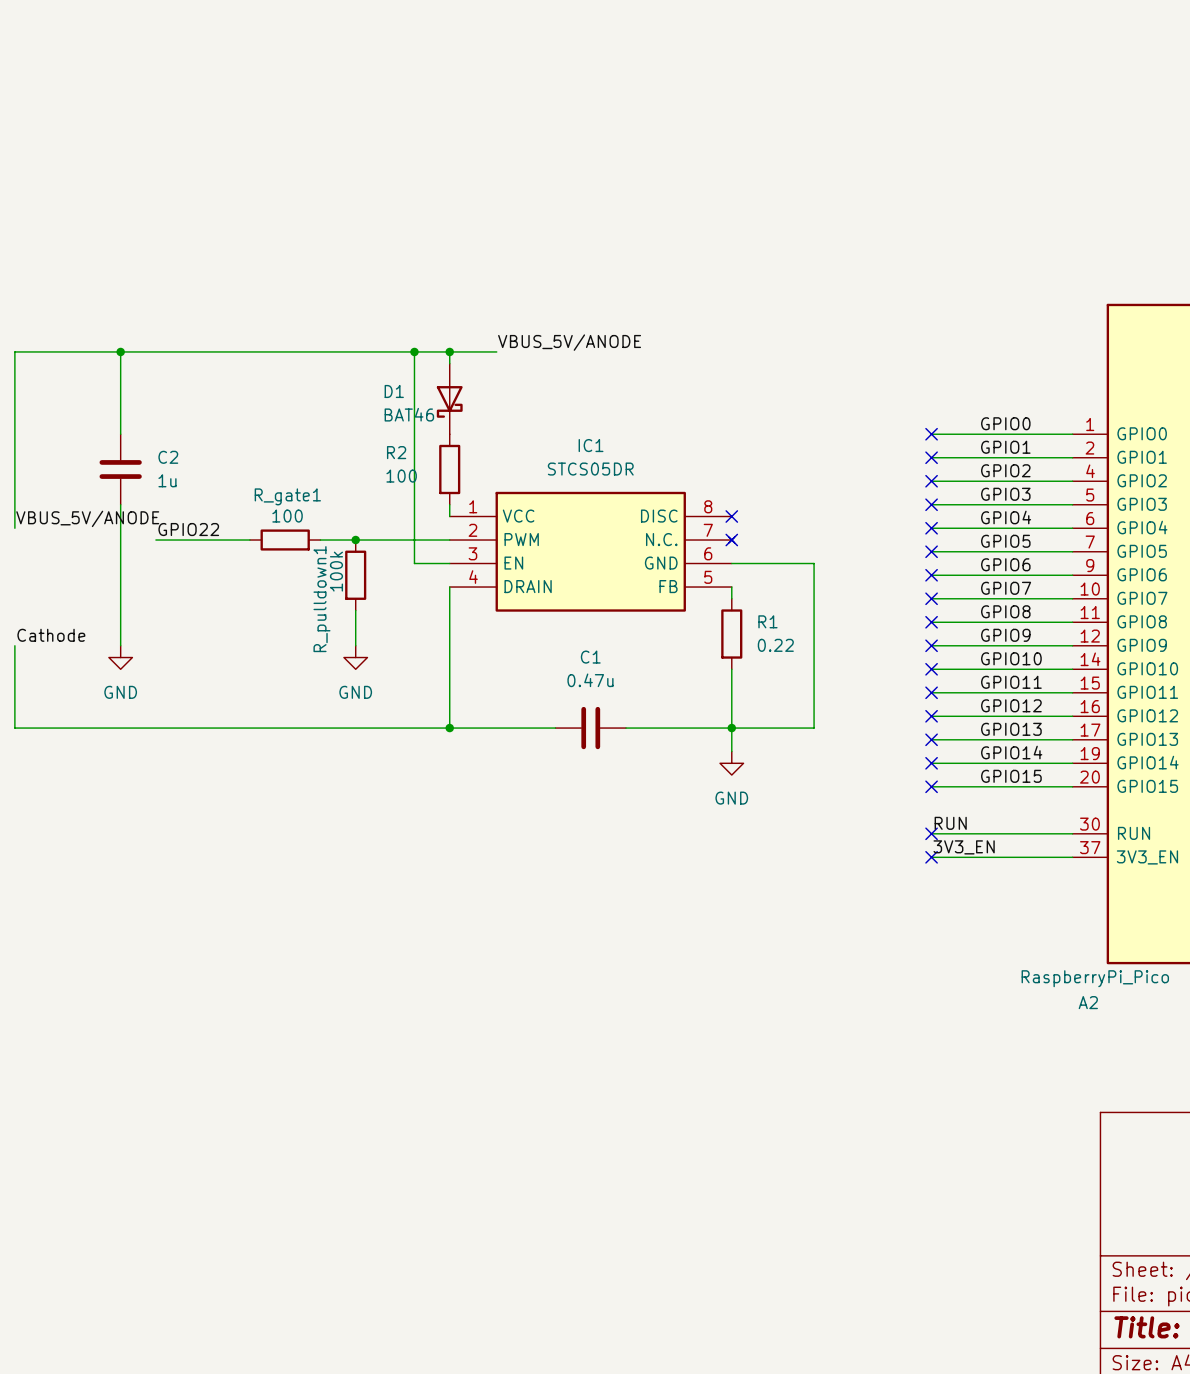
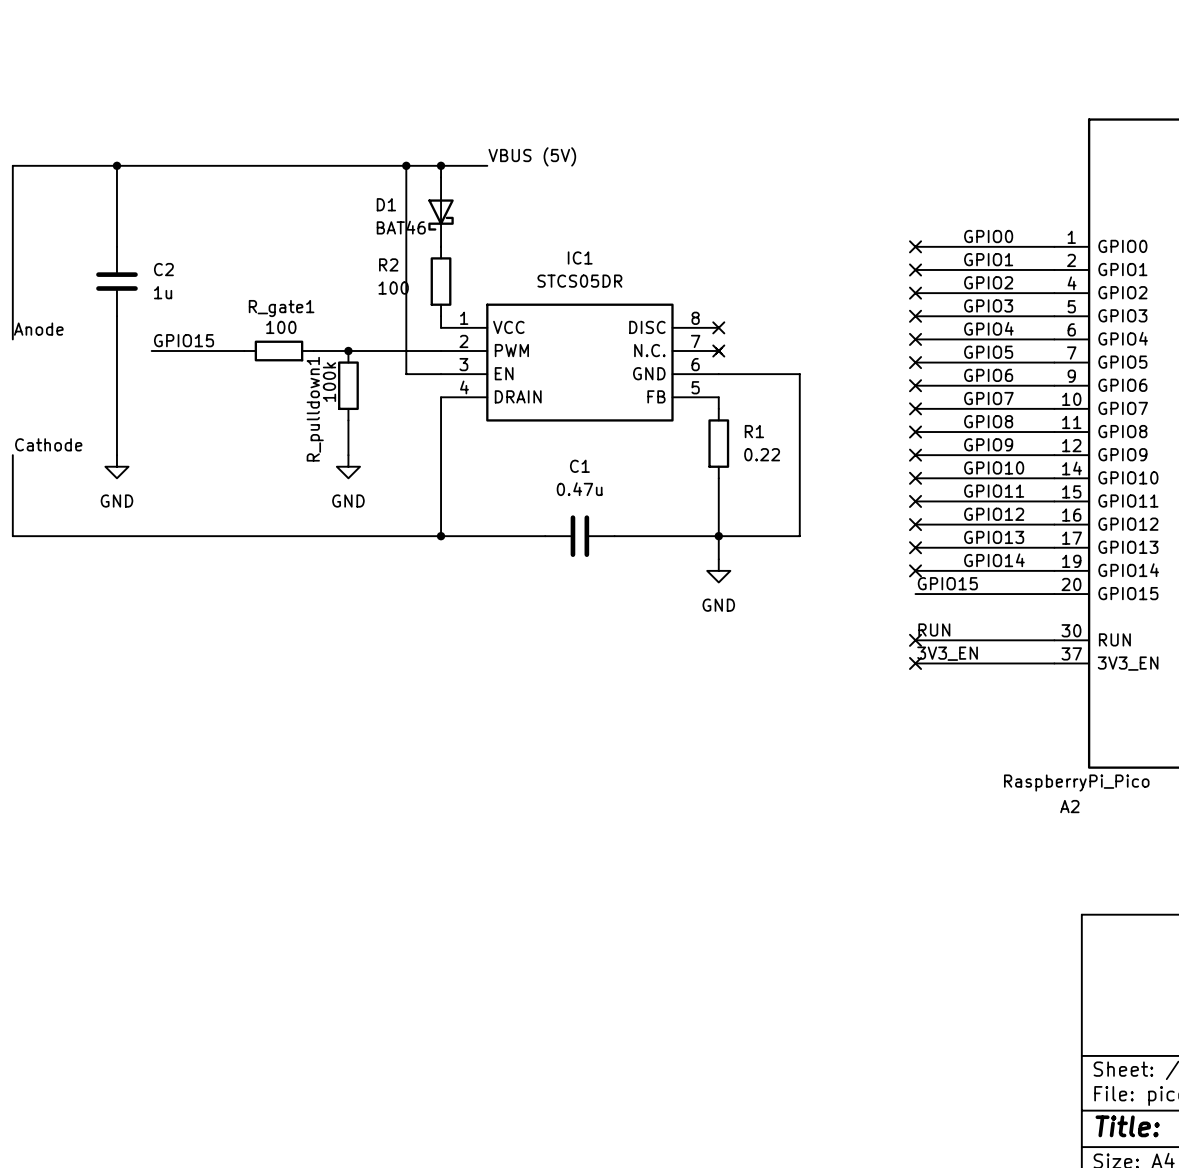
label: VBUS_5V/ANODE (569, 342) -> VBUS (5V) (532, 156)
label: VBUS_5V/ANODE (87, 518) -> Anode (38, 329)
label: GPIO22 (188, 529) -> GPIO15 (184, 340)
label position: GPIO15 (1011, 776) -> GPIO15 (947, 583)
no-connect mark: (931, 786) -> none

